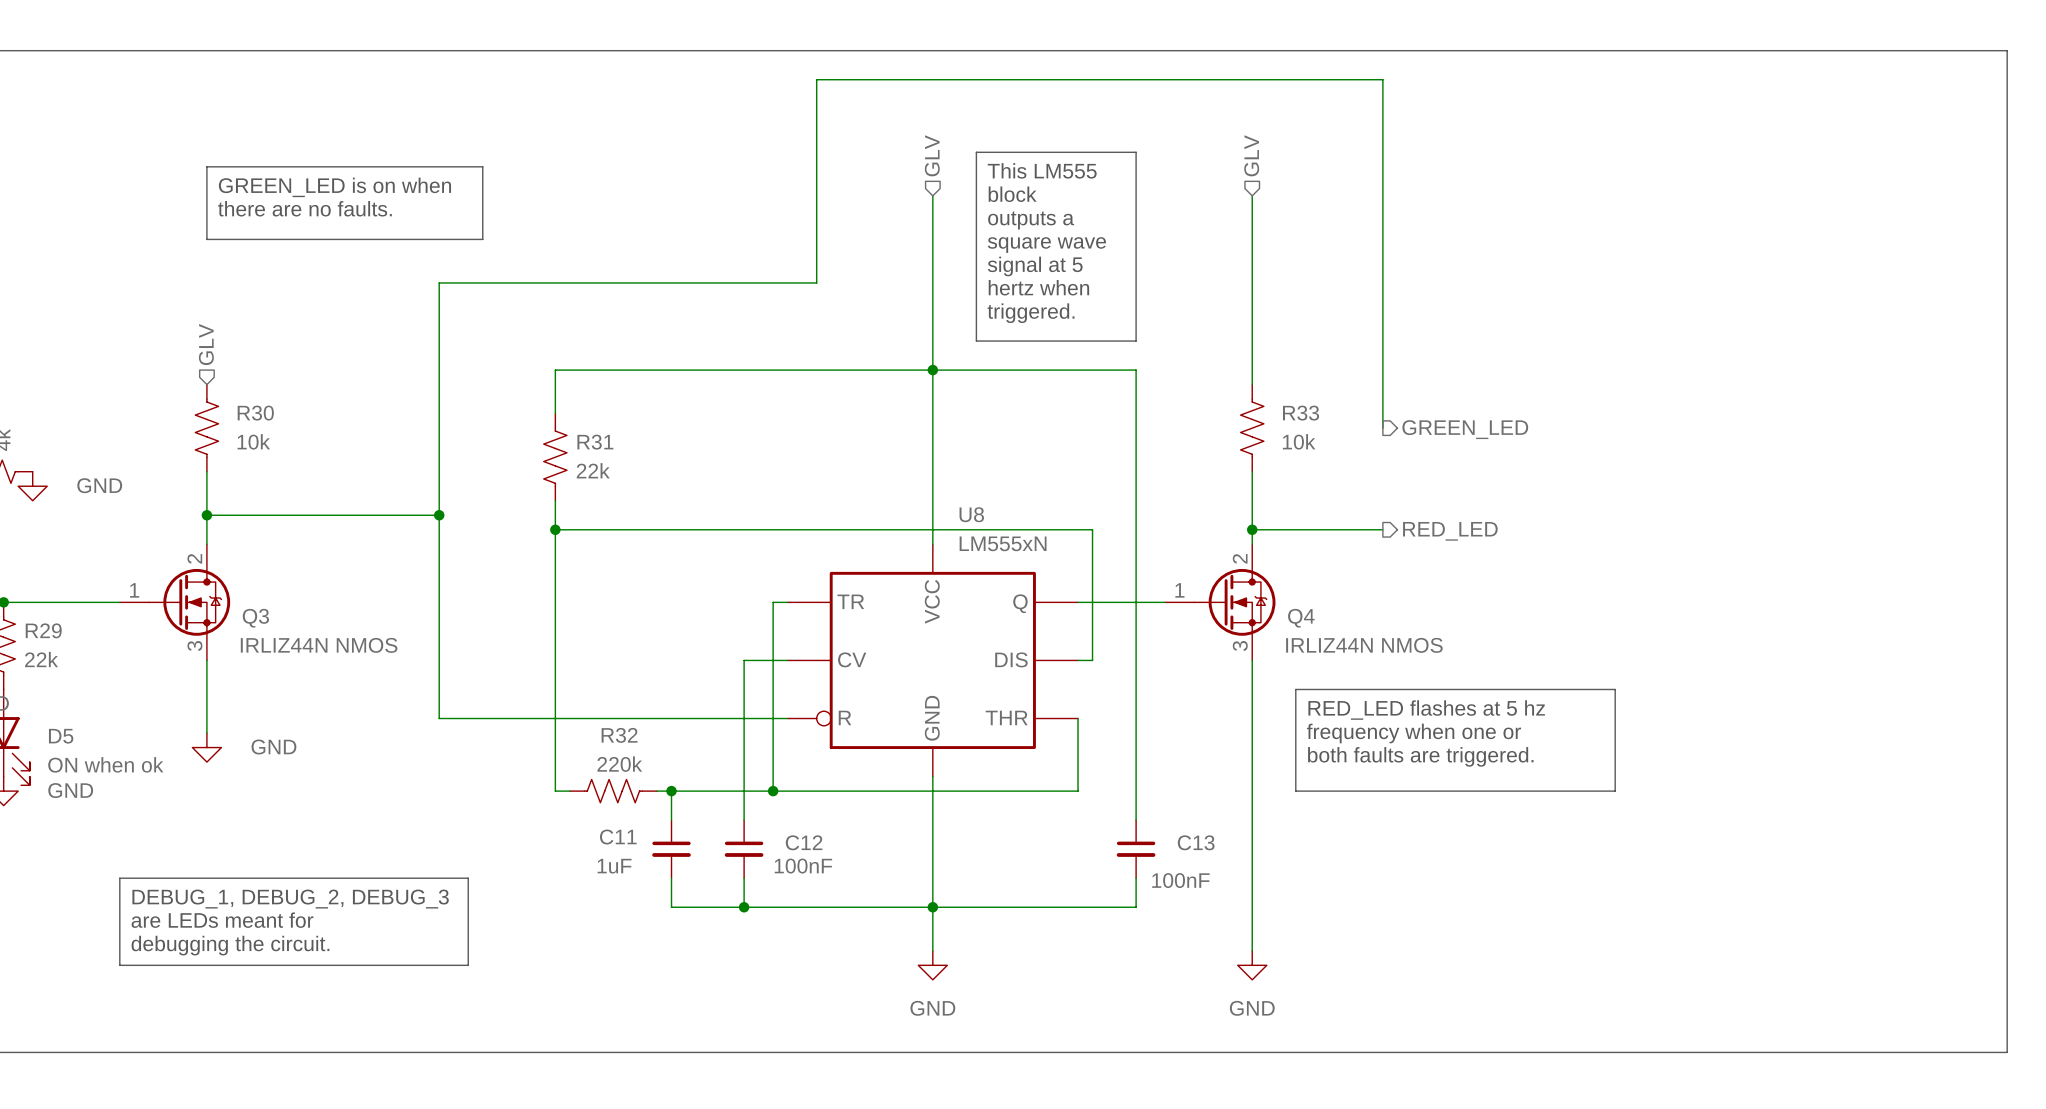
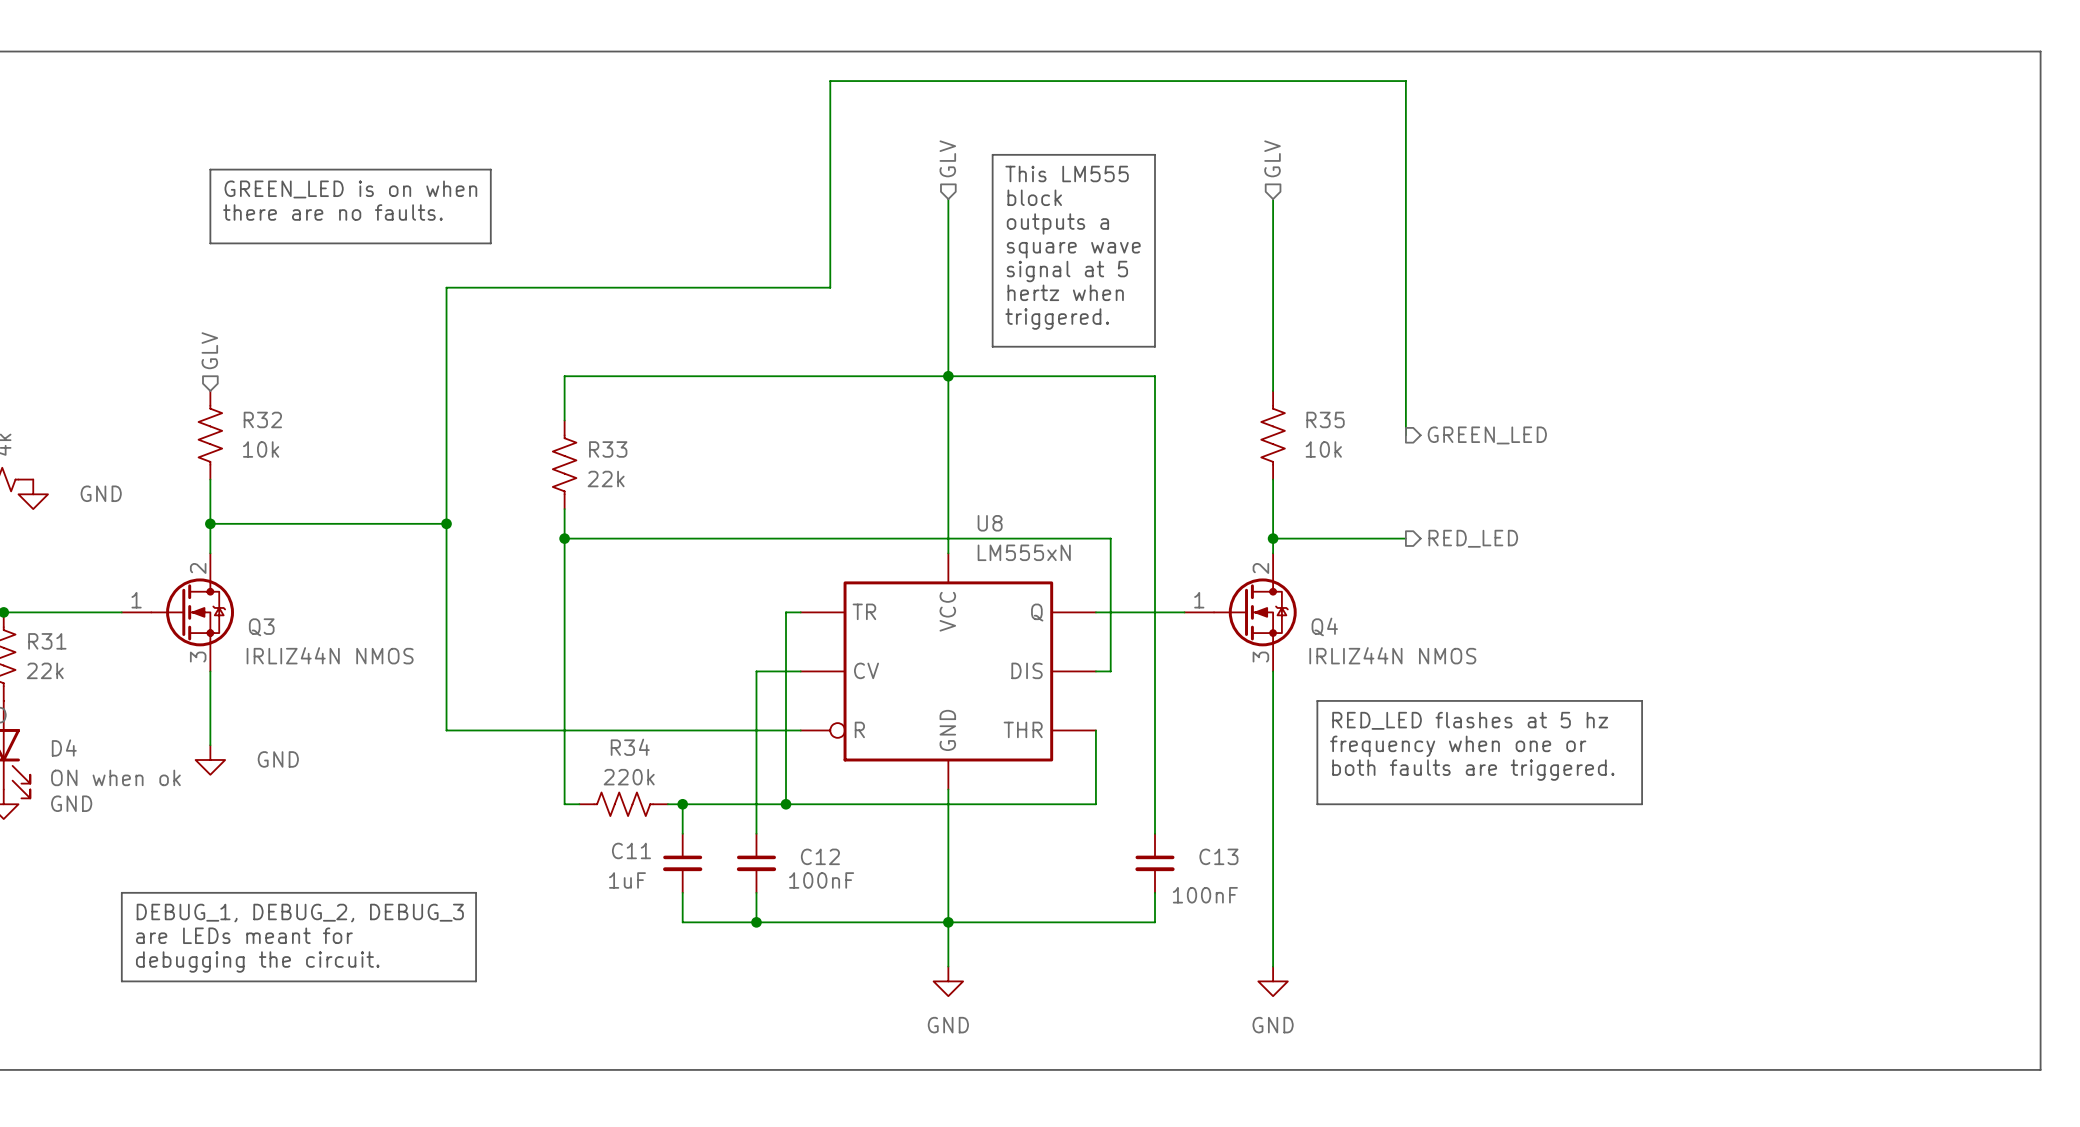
R30 name: R30 (255, 413) -> R32 (262, 419)
R33 name: R33 (1301, 413) -> R35 (1325, 419)
R31 name: R31 (595, 442) -> R33 (608, 449)
R29 name: R29 (43, 630) -> R31 (47, 641)
R32 name: R32 (619, 735) -> R34 (630, 747)
D5 name: D5 (61, 736) -> D4 (64, 748)

